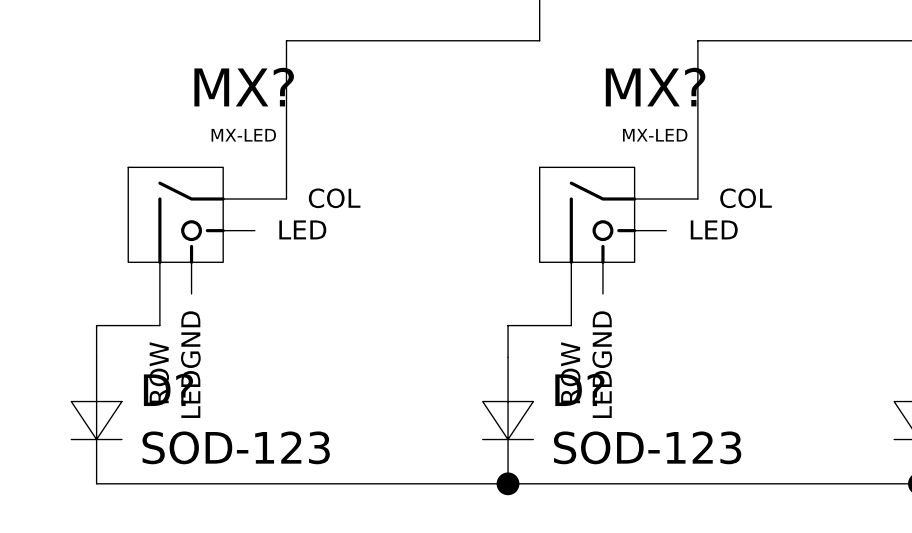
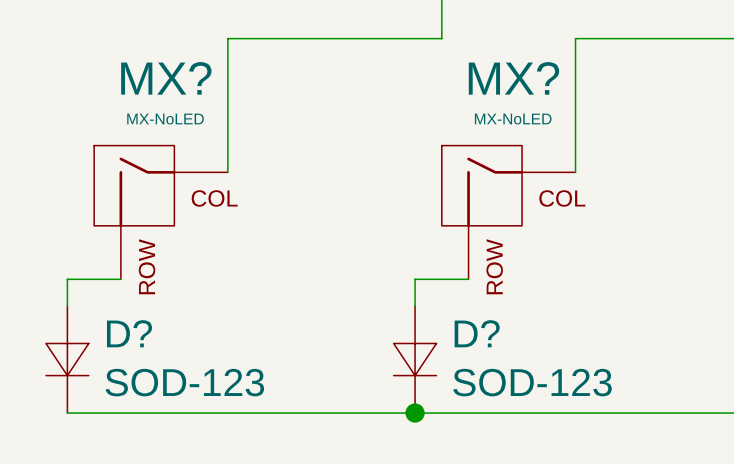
MX? value: MX-LED (243, 135) -> MX-NoLED (165, 119)
MX? value: MX-LED (655, 135) -> MX-NoLED (513, 119)
MX? symbol: [128, 167, 287, 326] -> [94, 145, 228, 280]
MX? symbol: [539, 167, 698, 326] -> [441, 145, 576, 280]

